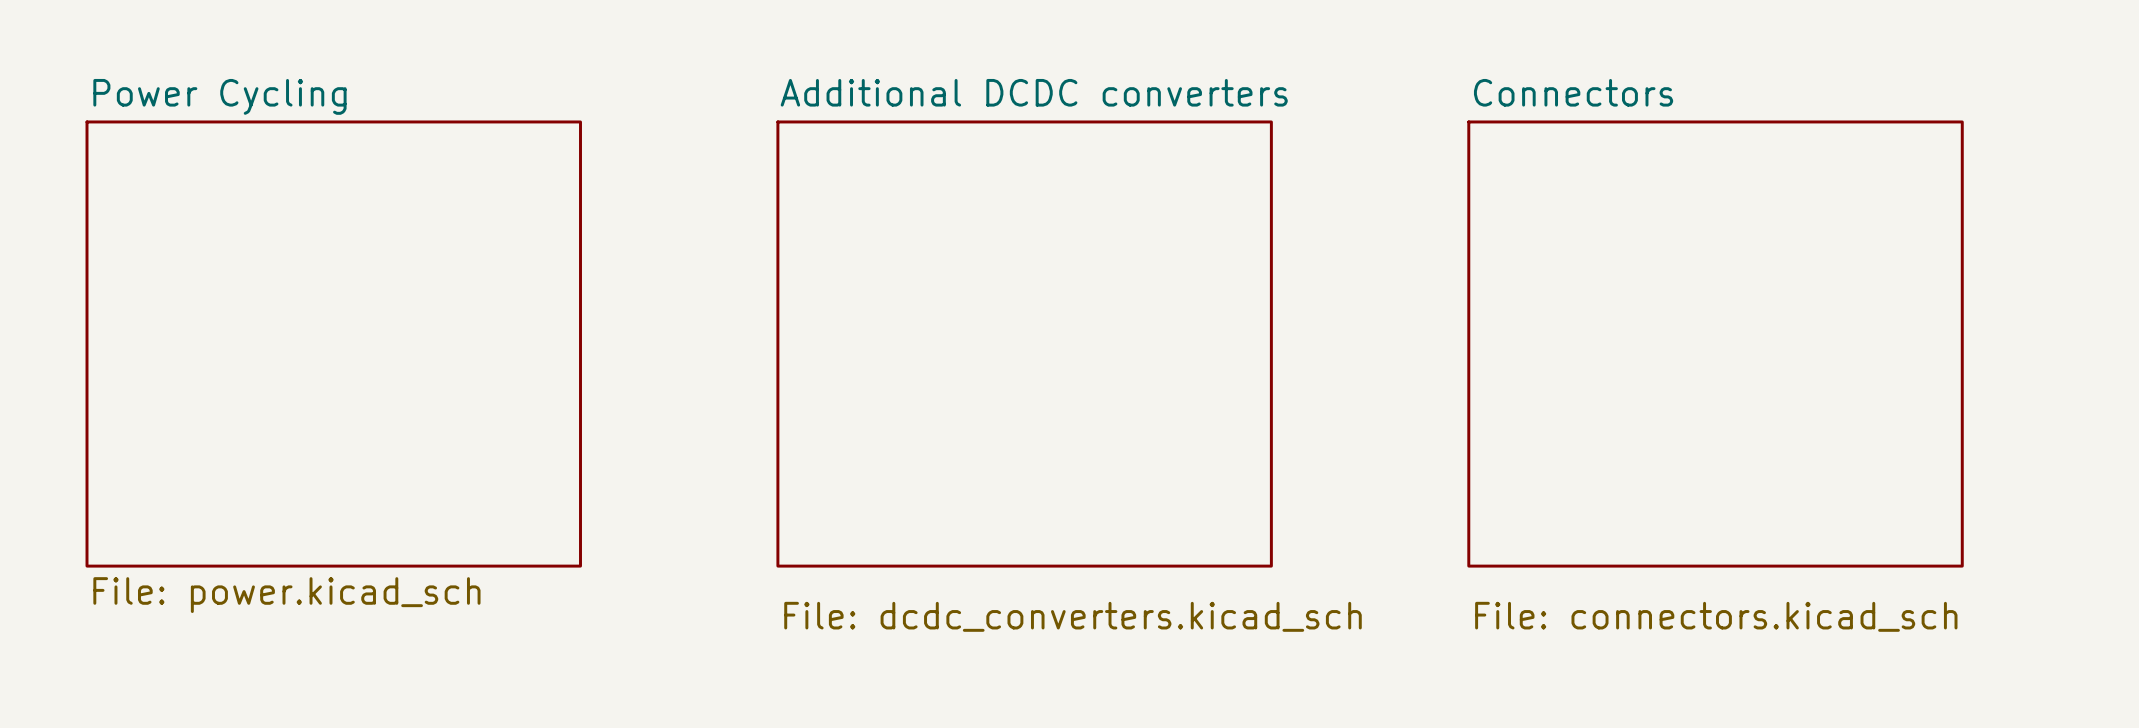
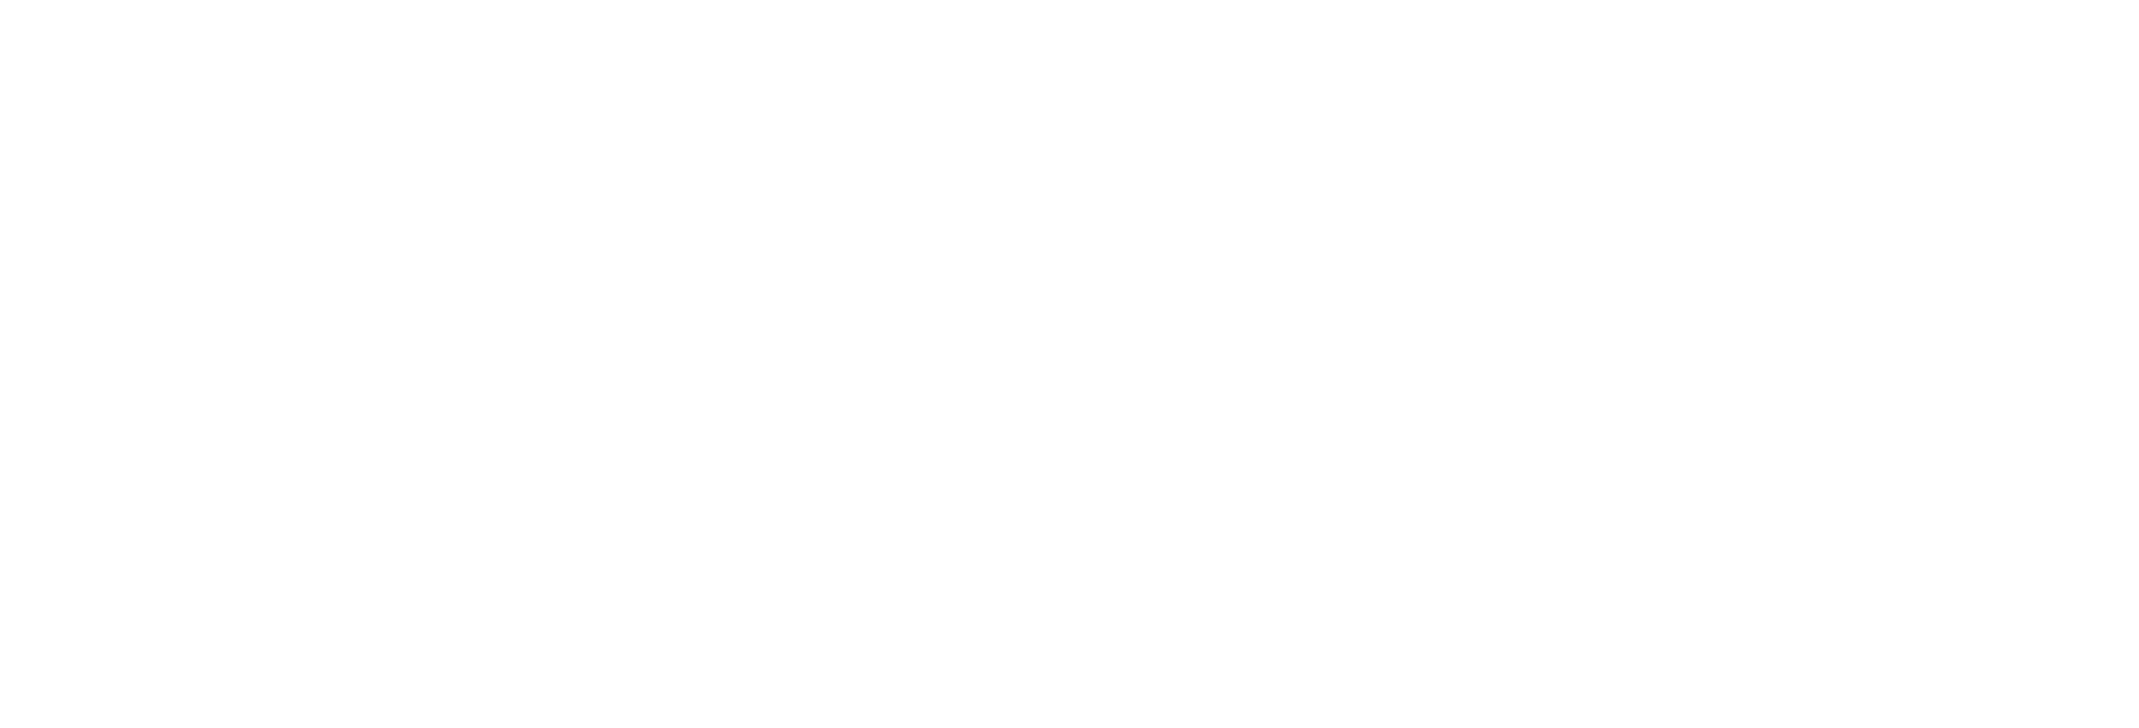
sheet Power Cycling: File: power.kicad_sch (333, 344) -> none
sheet Additional DCDC converters: File: dcdc_converters.kicad_sch (1024, 344) -> none
sheet Connectors: File: connectors.kicad_sch (1715, 344) -> none

